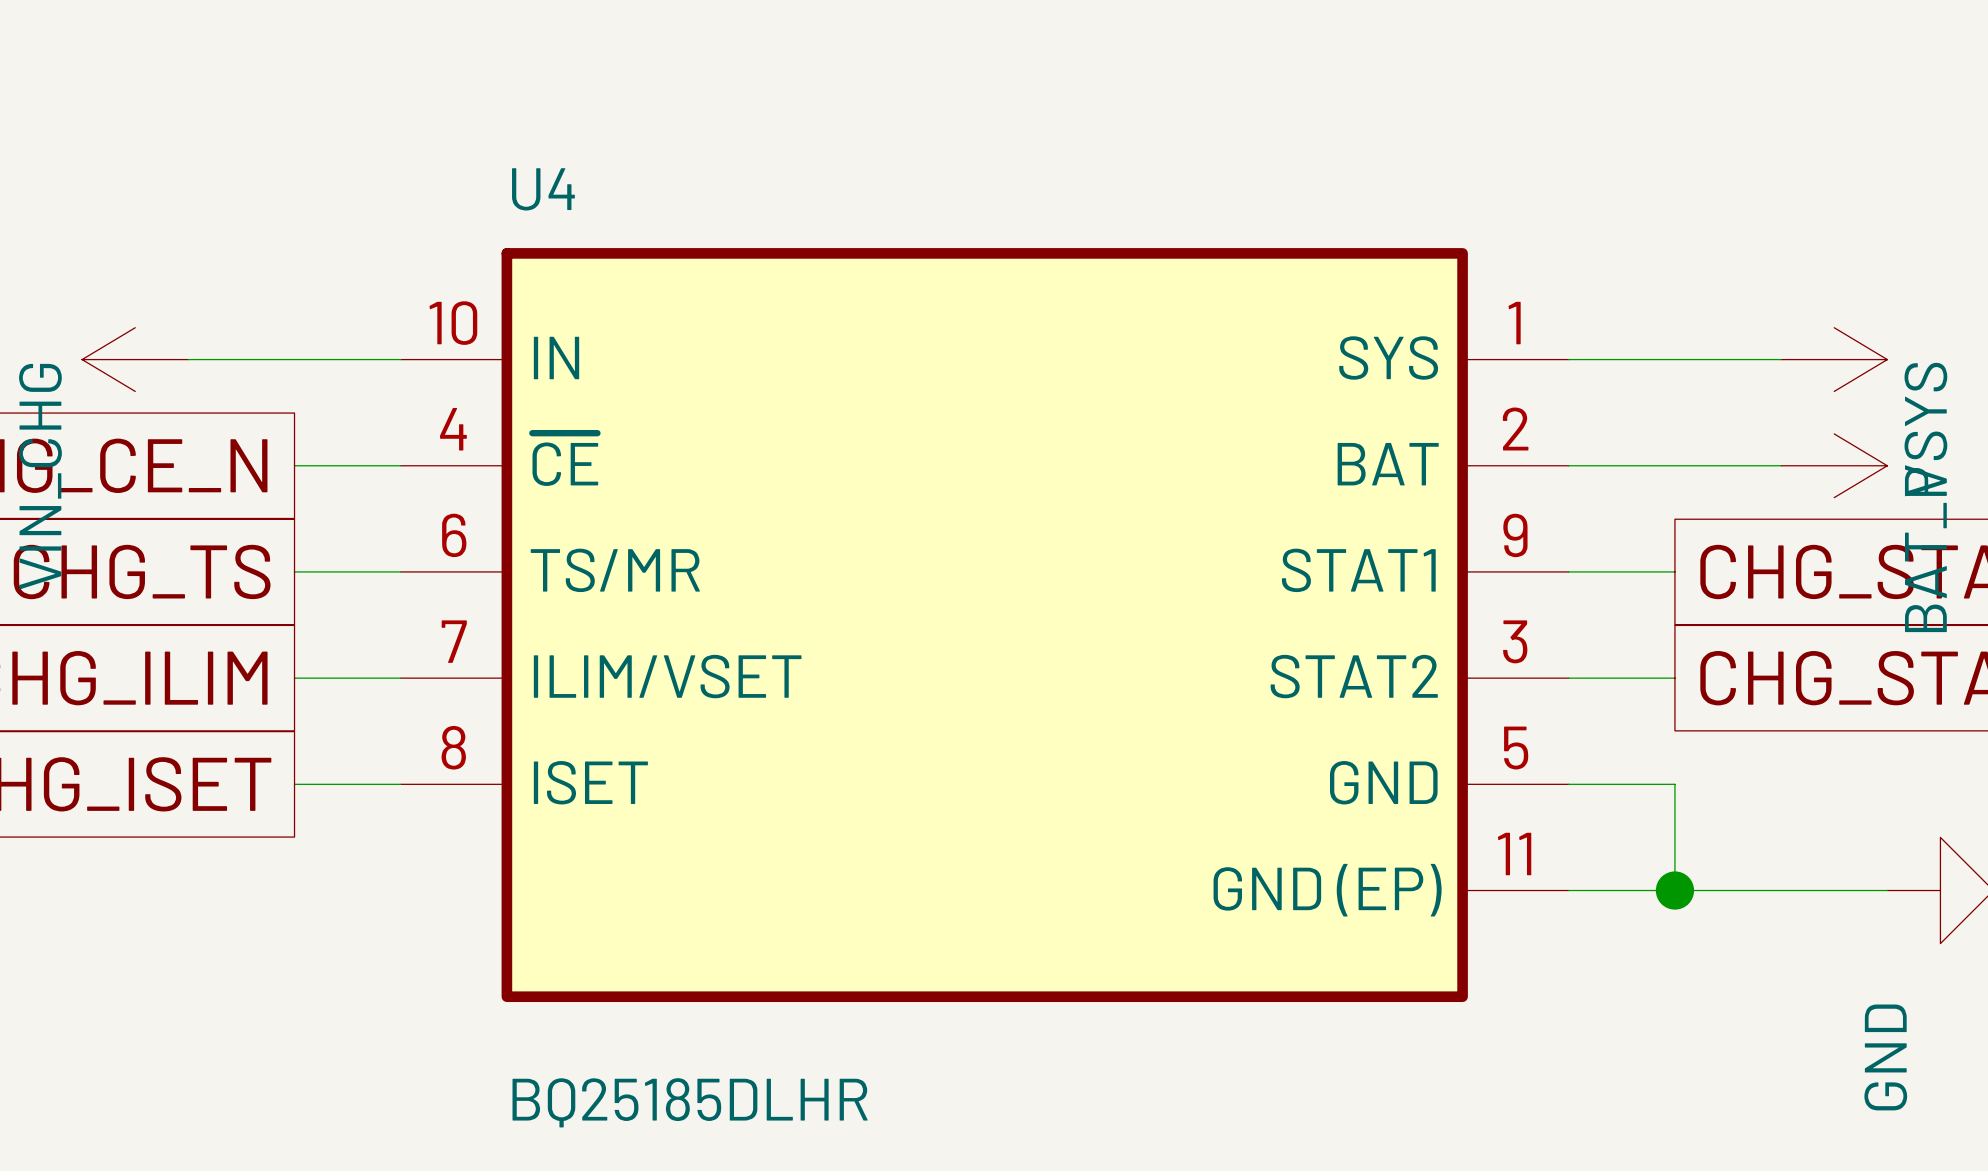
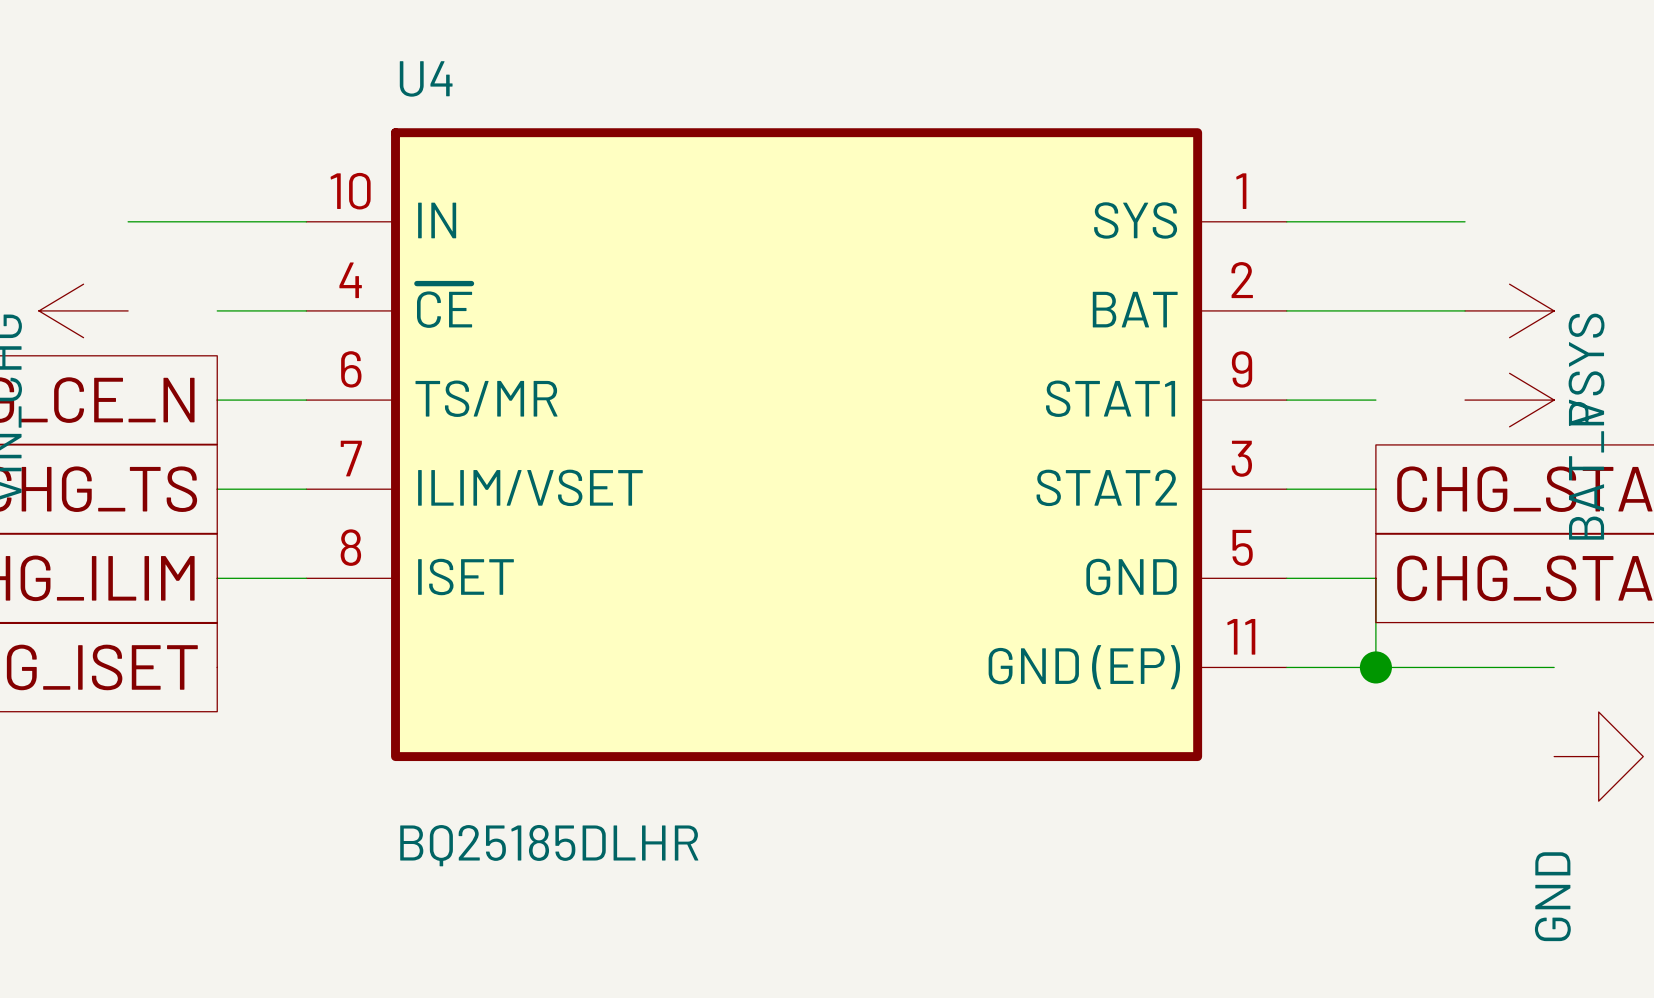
wire: none -> (128, 221) (306, 221)
wire: none -> (1286, 221) (1465, 221)
wire: (188, 359) (294, 359) -> none
wire: (1674, 465) (1781, 465) -> none
U4 position: (984, 625) -> (796, 444)
wire: none -> (1375, 578) (1375, 667) (1554, 667)
wire: (294, 784) (400, 784) -> none
wire: (1674, 784) (1674, 890) -> none
wire: (1568, 890) (1887, 890) -> none
junction position: (1674, 890) -> (1375, 667)

